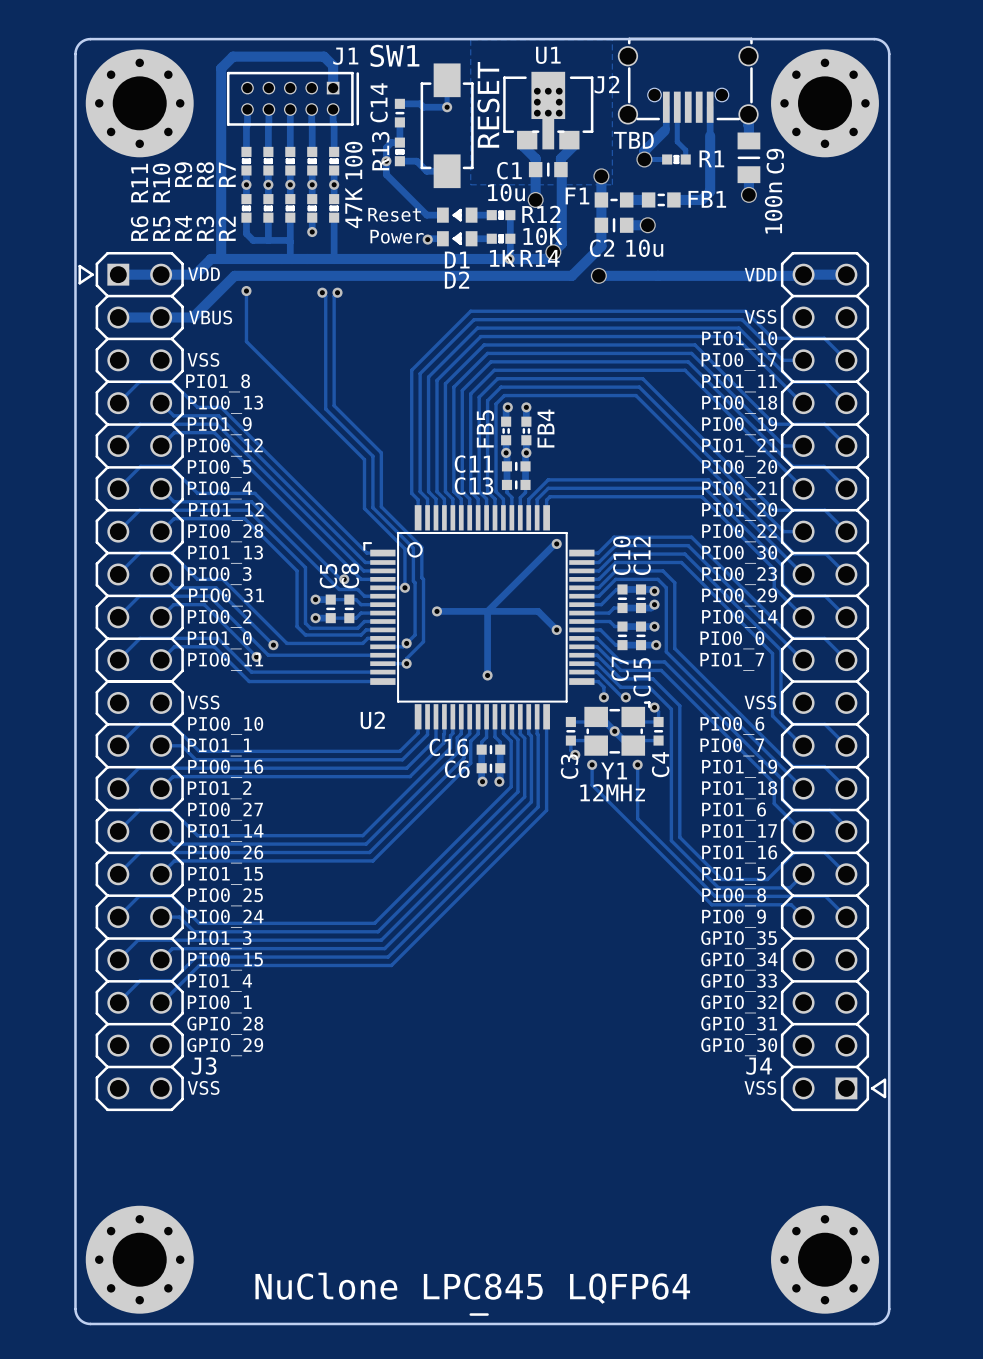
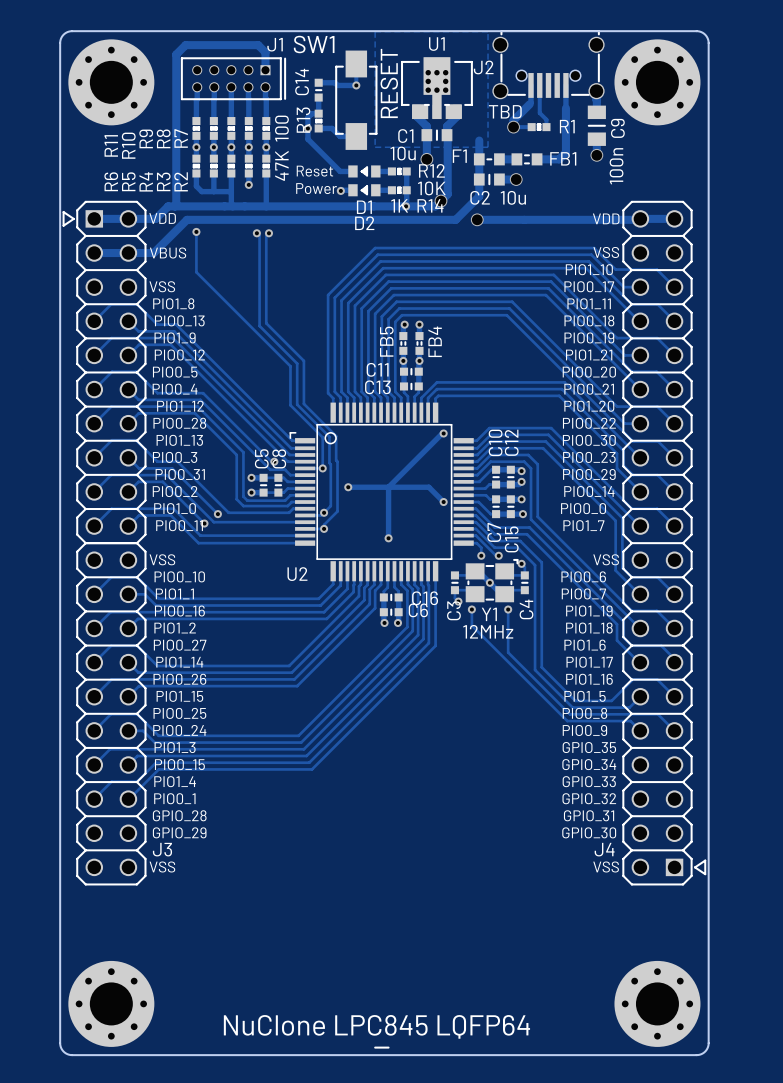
via: (601, 176) -> none
C16 name position: C16 (448, 747) -> C16 (425, 598)
C6 name position: C6 (457, 769) -> C6 (418, 610)

